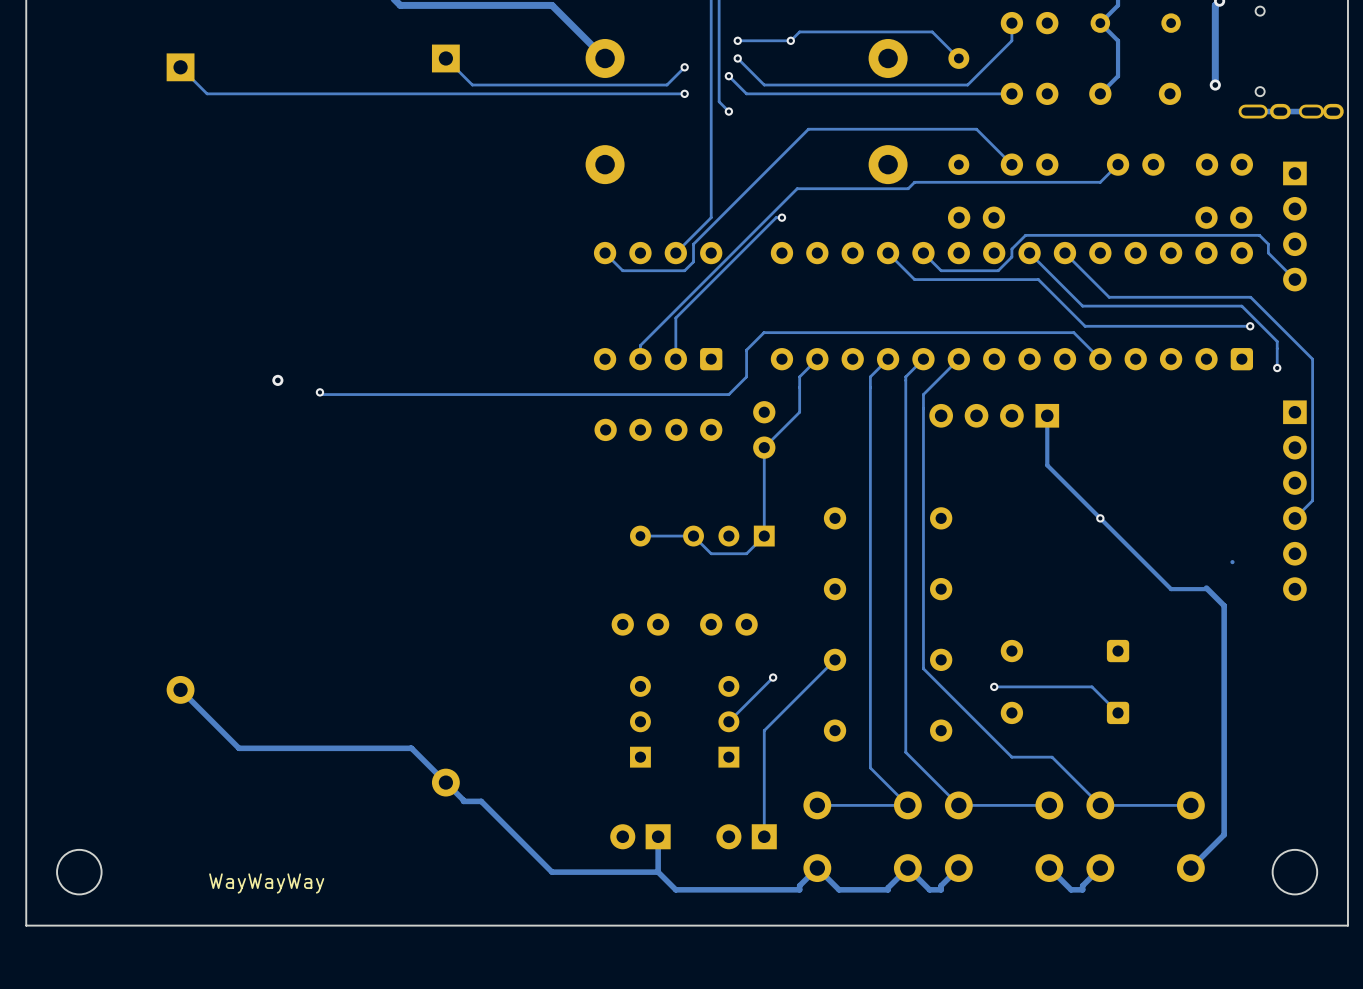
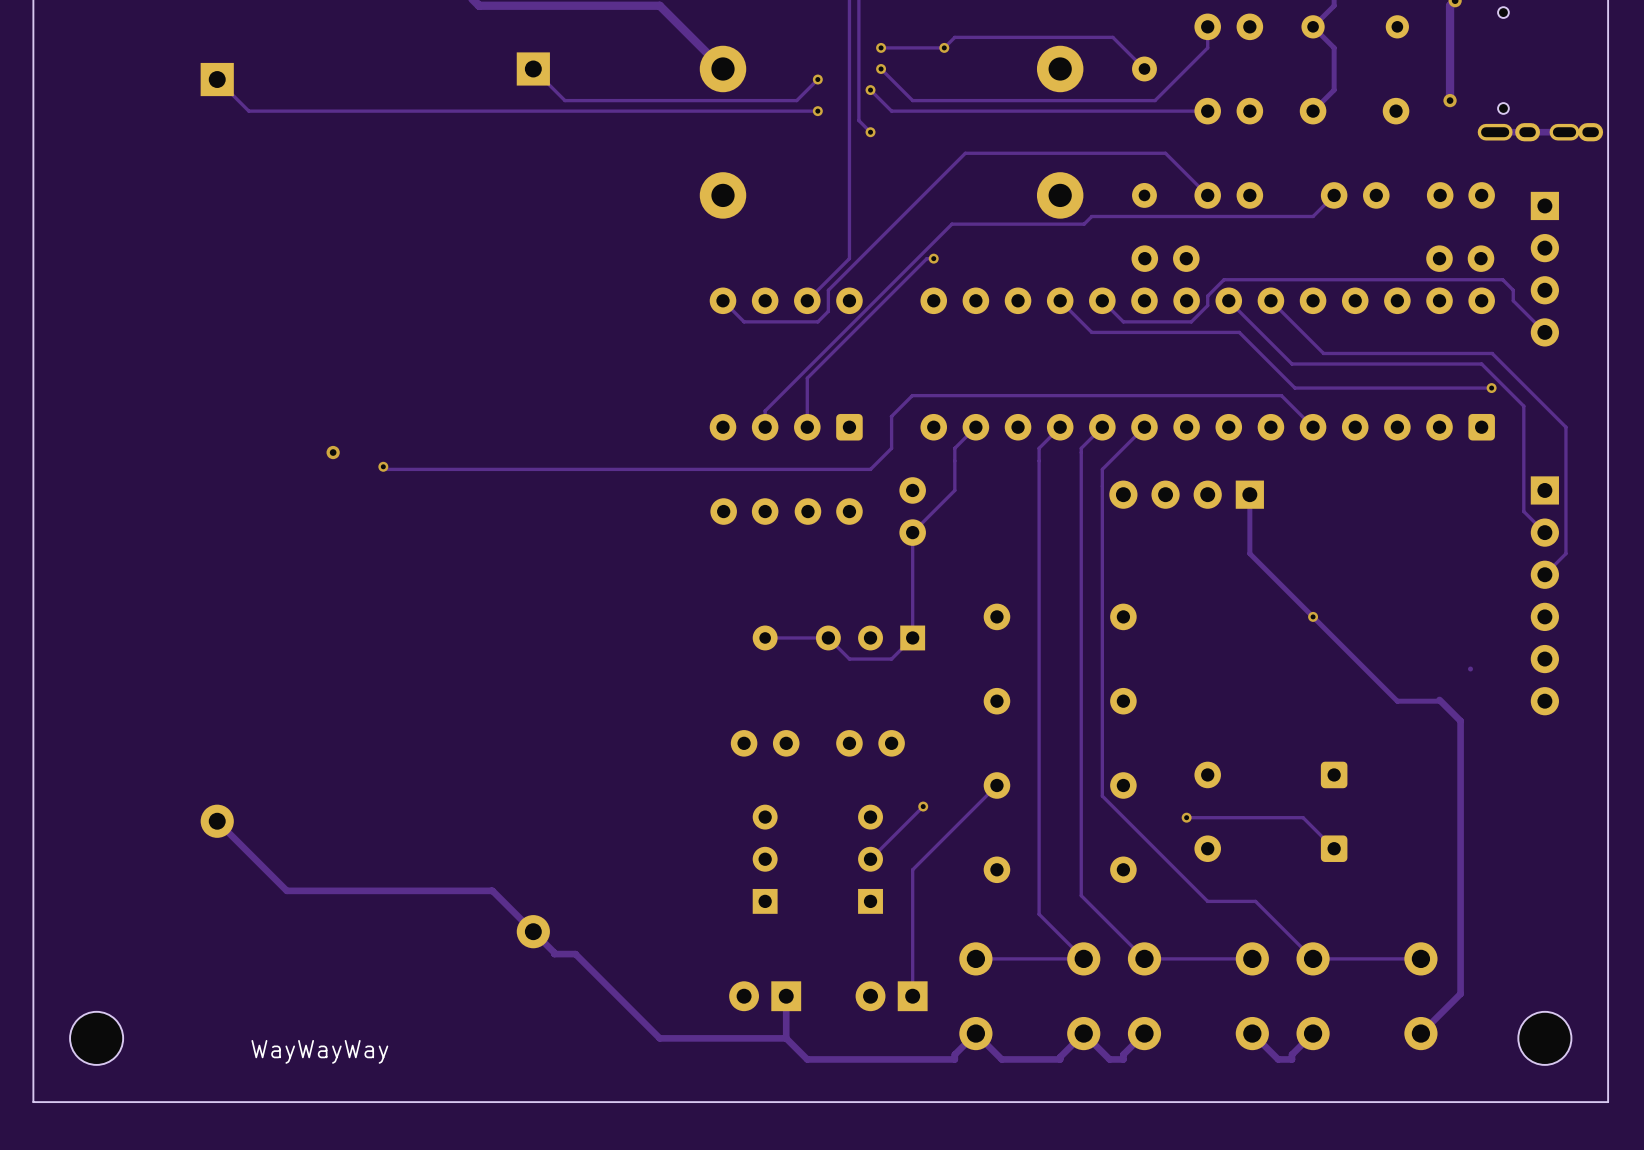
track: none -> (1523, 437) (1523, 511) (1544, 532)
via: (1277, 368) -> none
track: (1312, 465) (1312, 500) (1294, 518) -> (1565, 553) (1544, 574)

